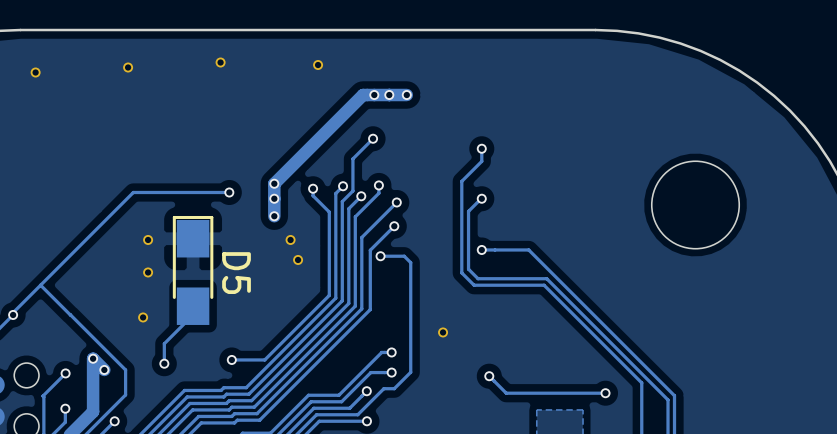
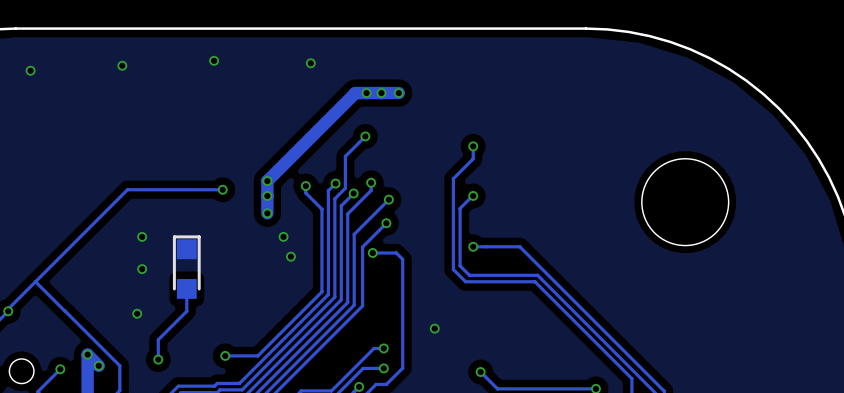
D5: (193, 270) -> none
part: none -> (186, 267)

